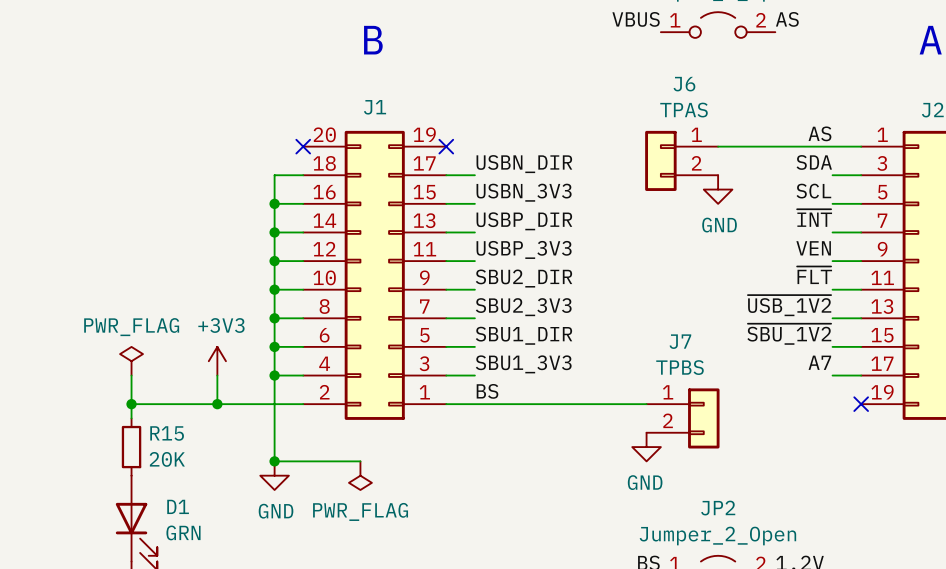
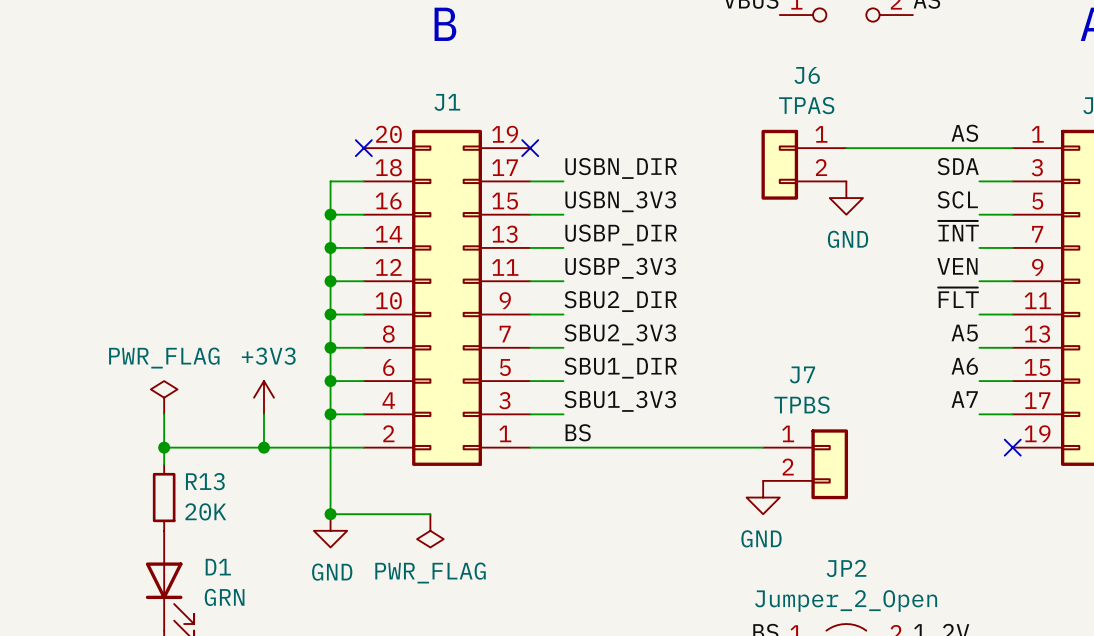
label: ~{USB_1V2} (789, 305) -> A5 (964, 333)
label: ~{SBU_1V2} (789, 334) -> A6 (964, 366)
R15 name: R15 (167, 433) -> R13 (205, 481)

